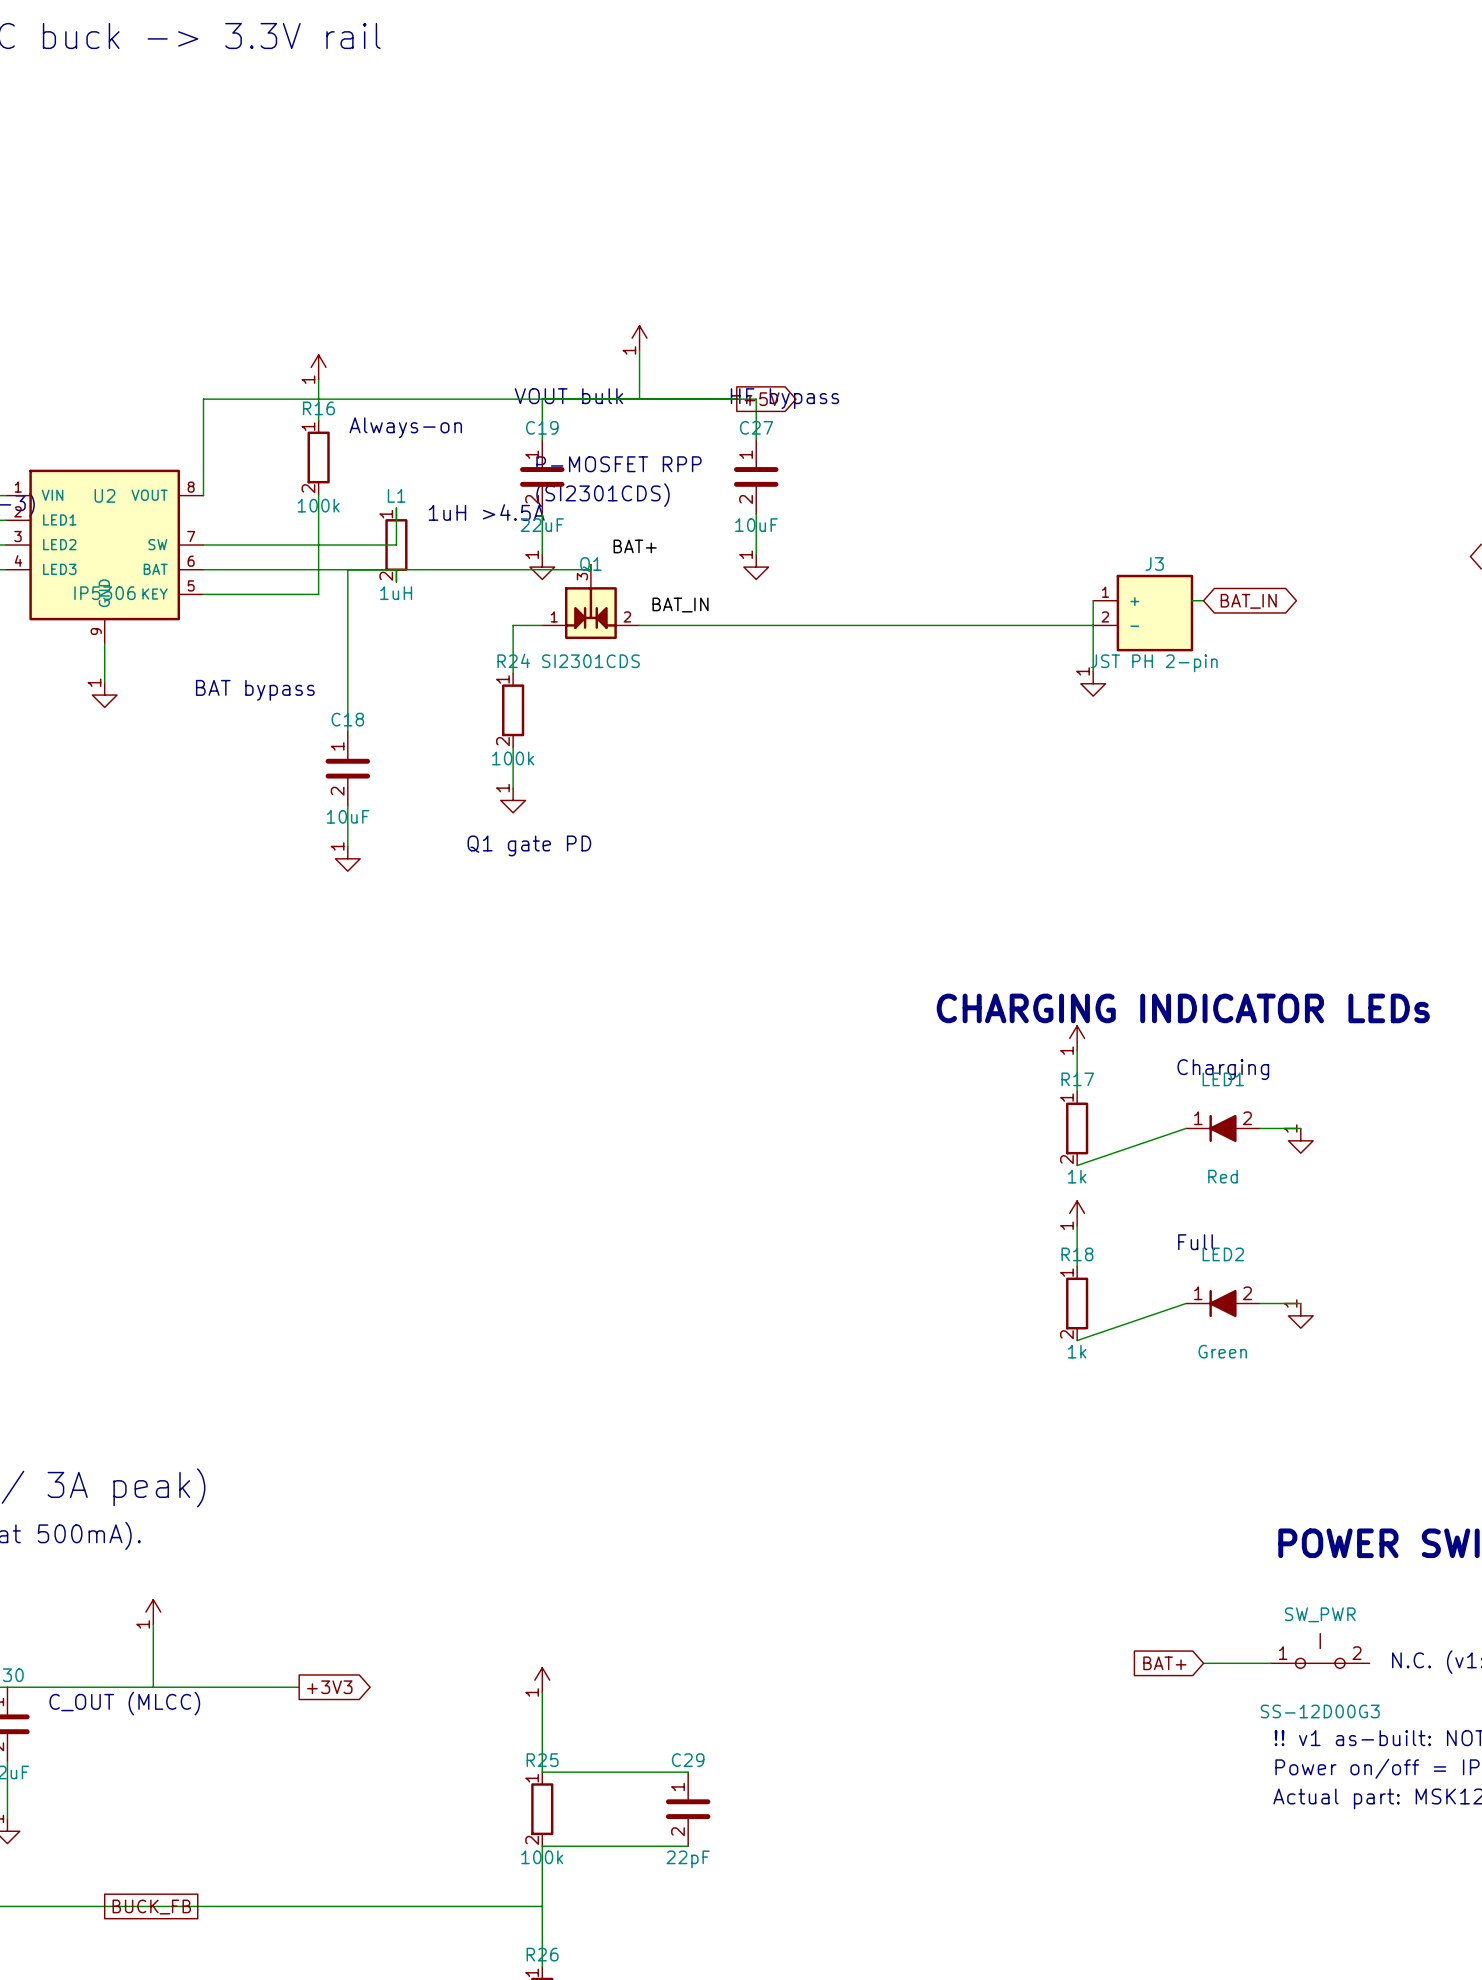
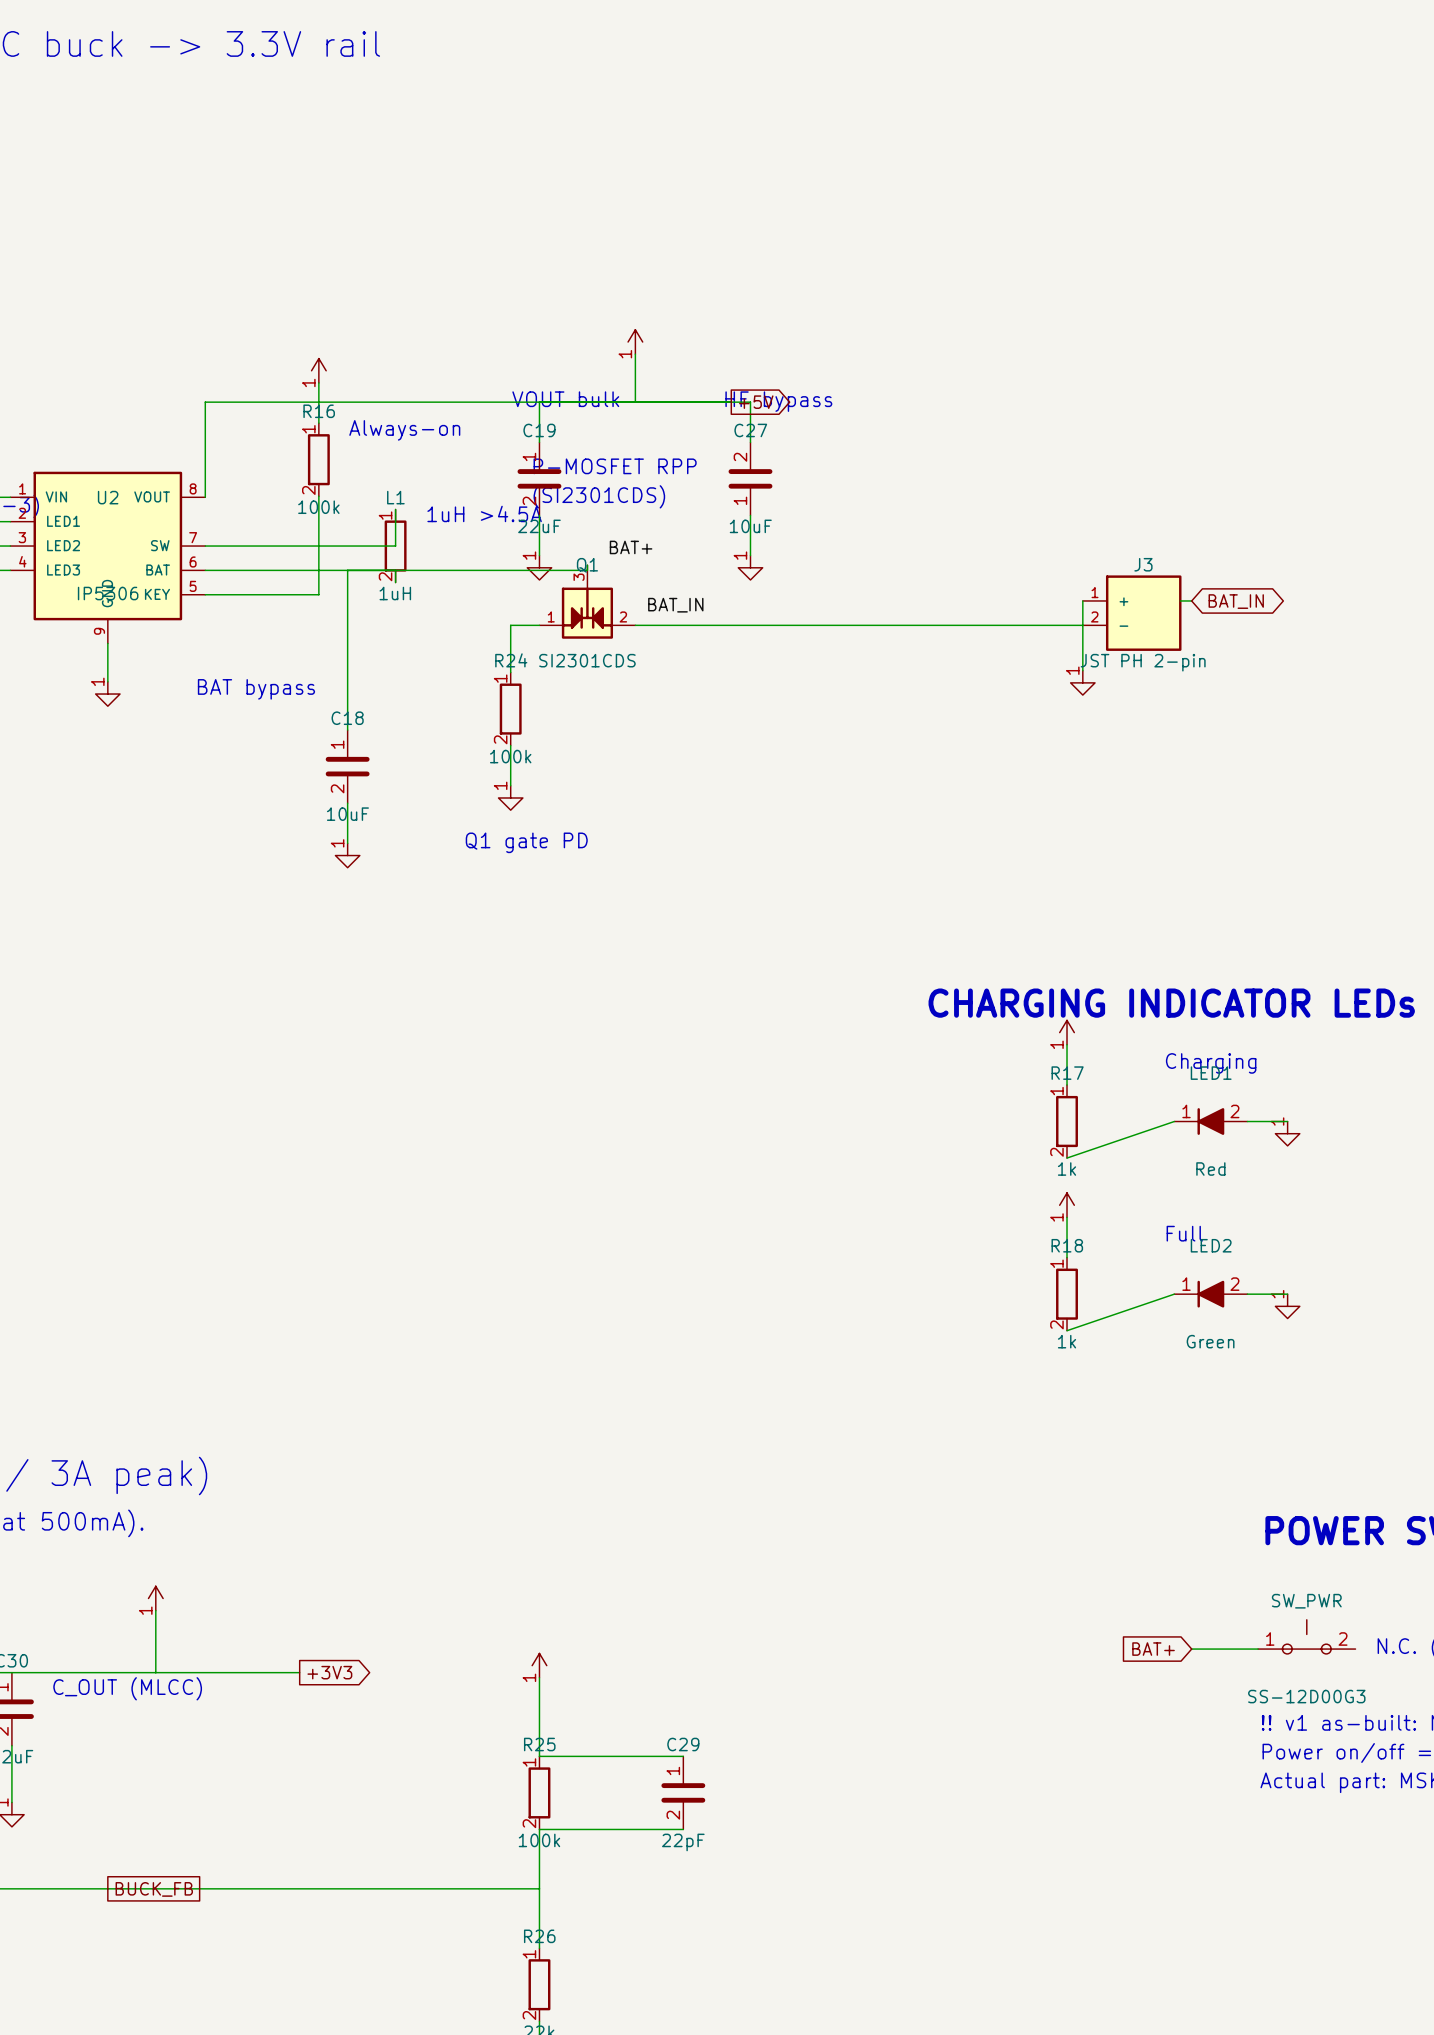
C27 rotation: 0° (756, 476) -> 180° (750, 478)

